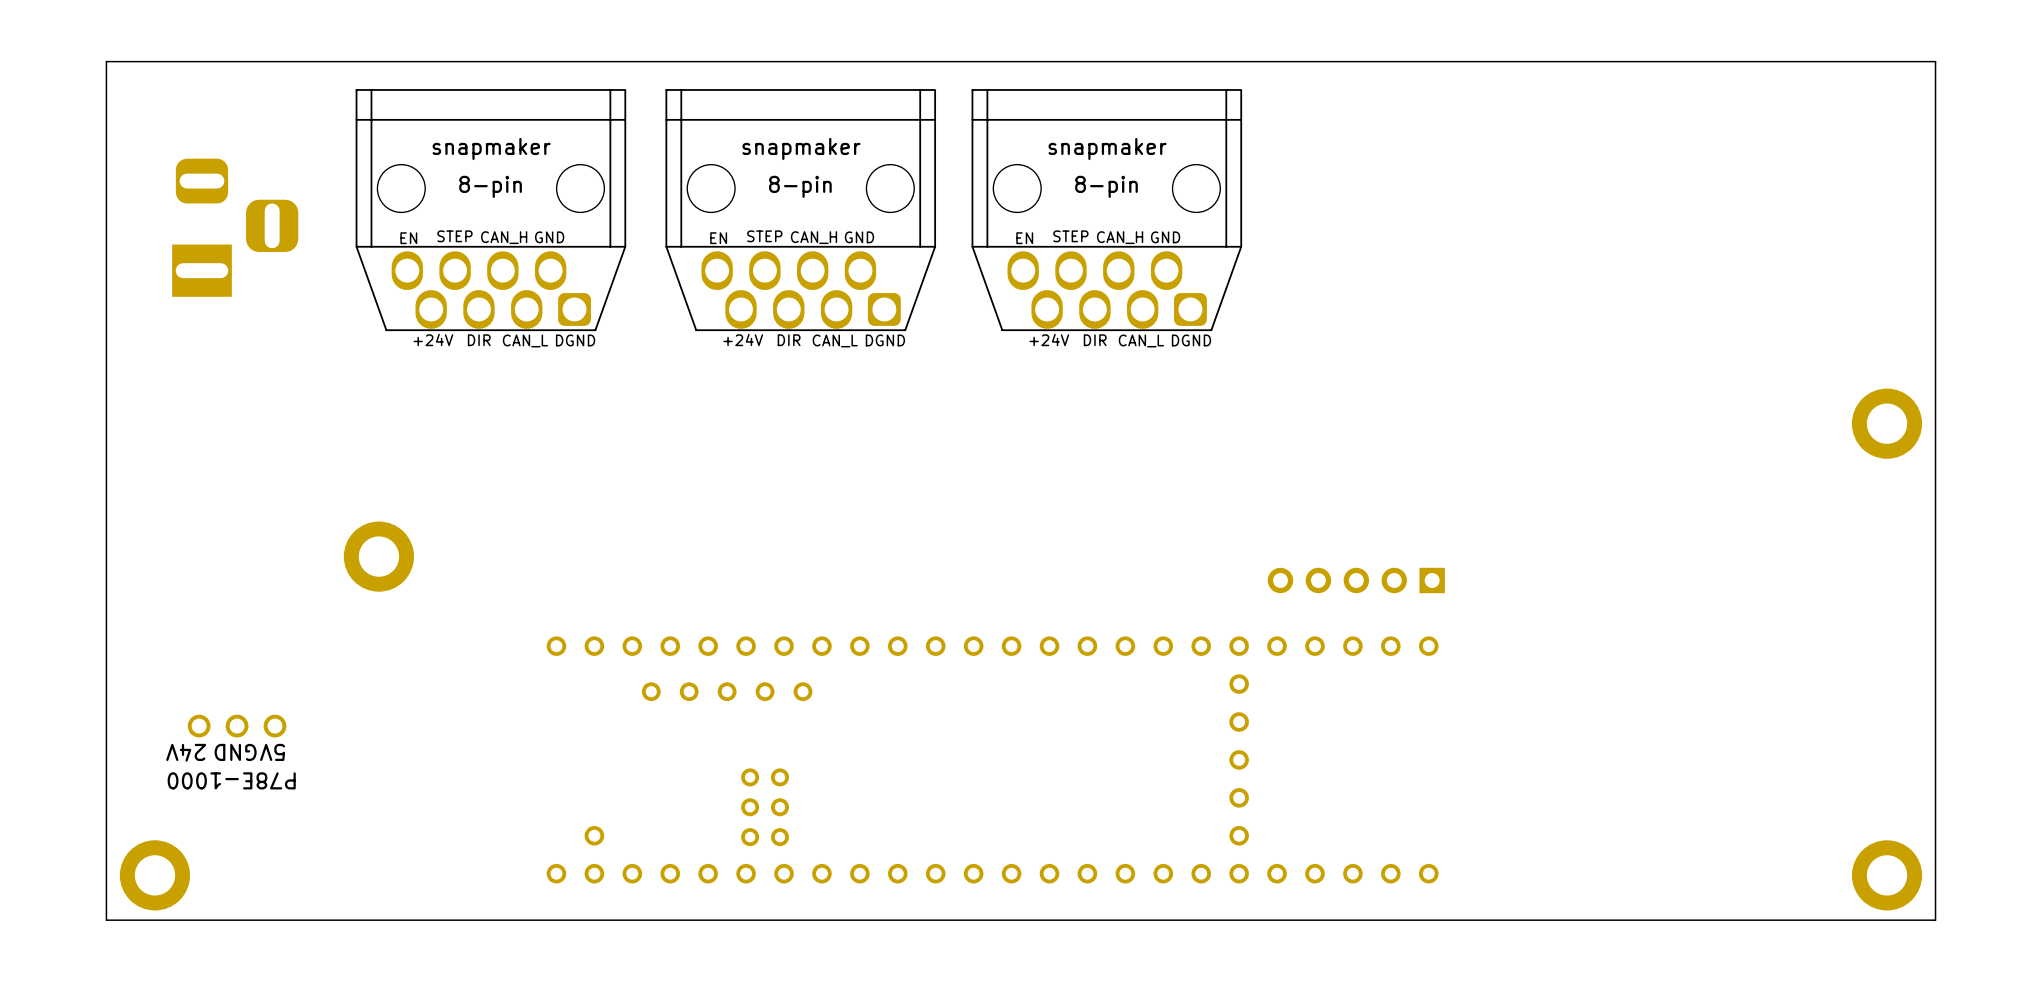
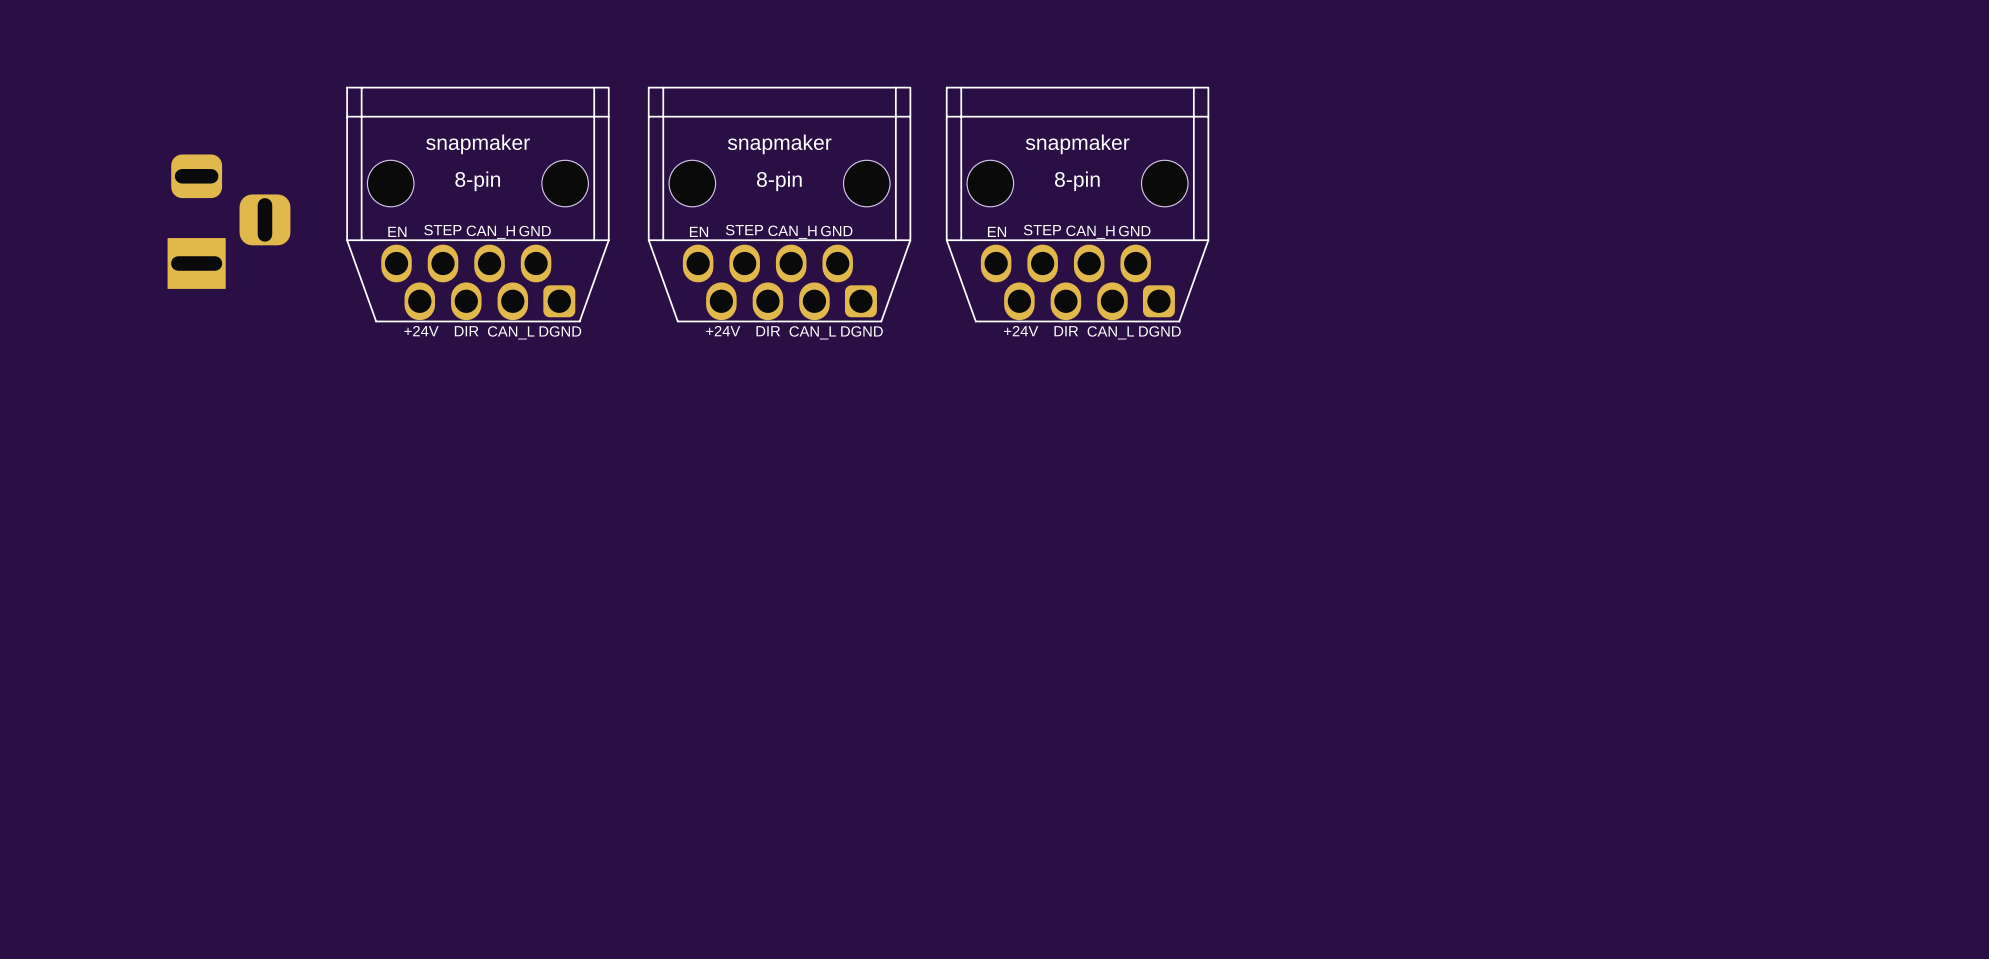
board edge: (1935, 61) (106, 61) (106, 920) (1935, 920) (1935, 61) -> none
part: (1887, 423) -> none
part: (378, 556) -> none
part: (1356, 580) -> none
part: (237, 726) -> none
part: (992, 759) -> none
part: (154, 875) -> none
part: (1887, 875) -> none

